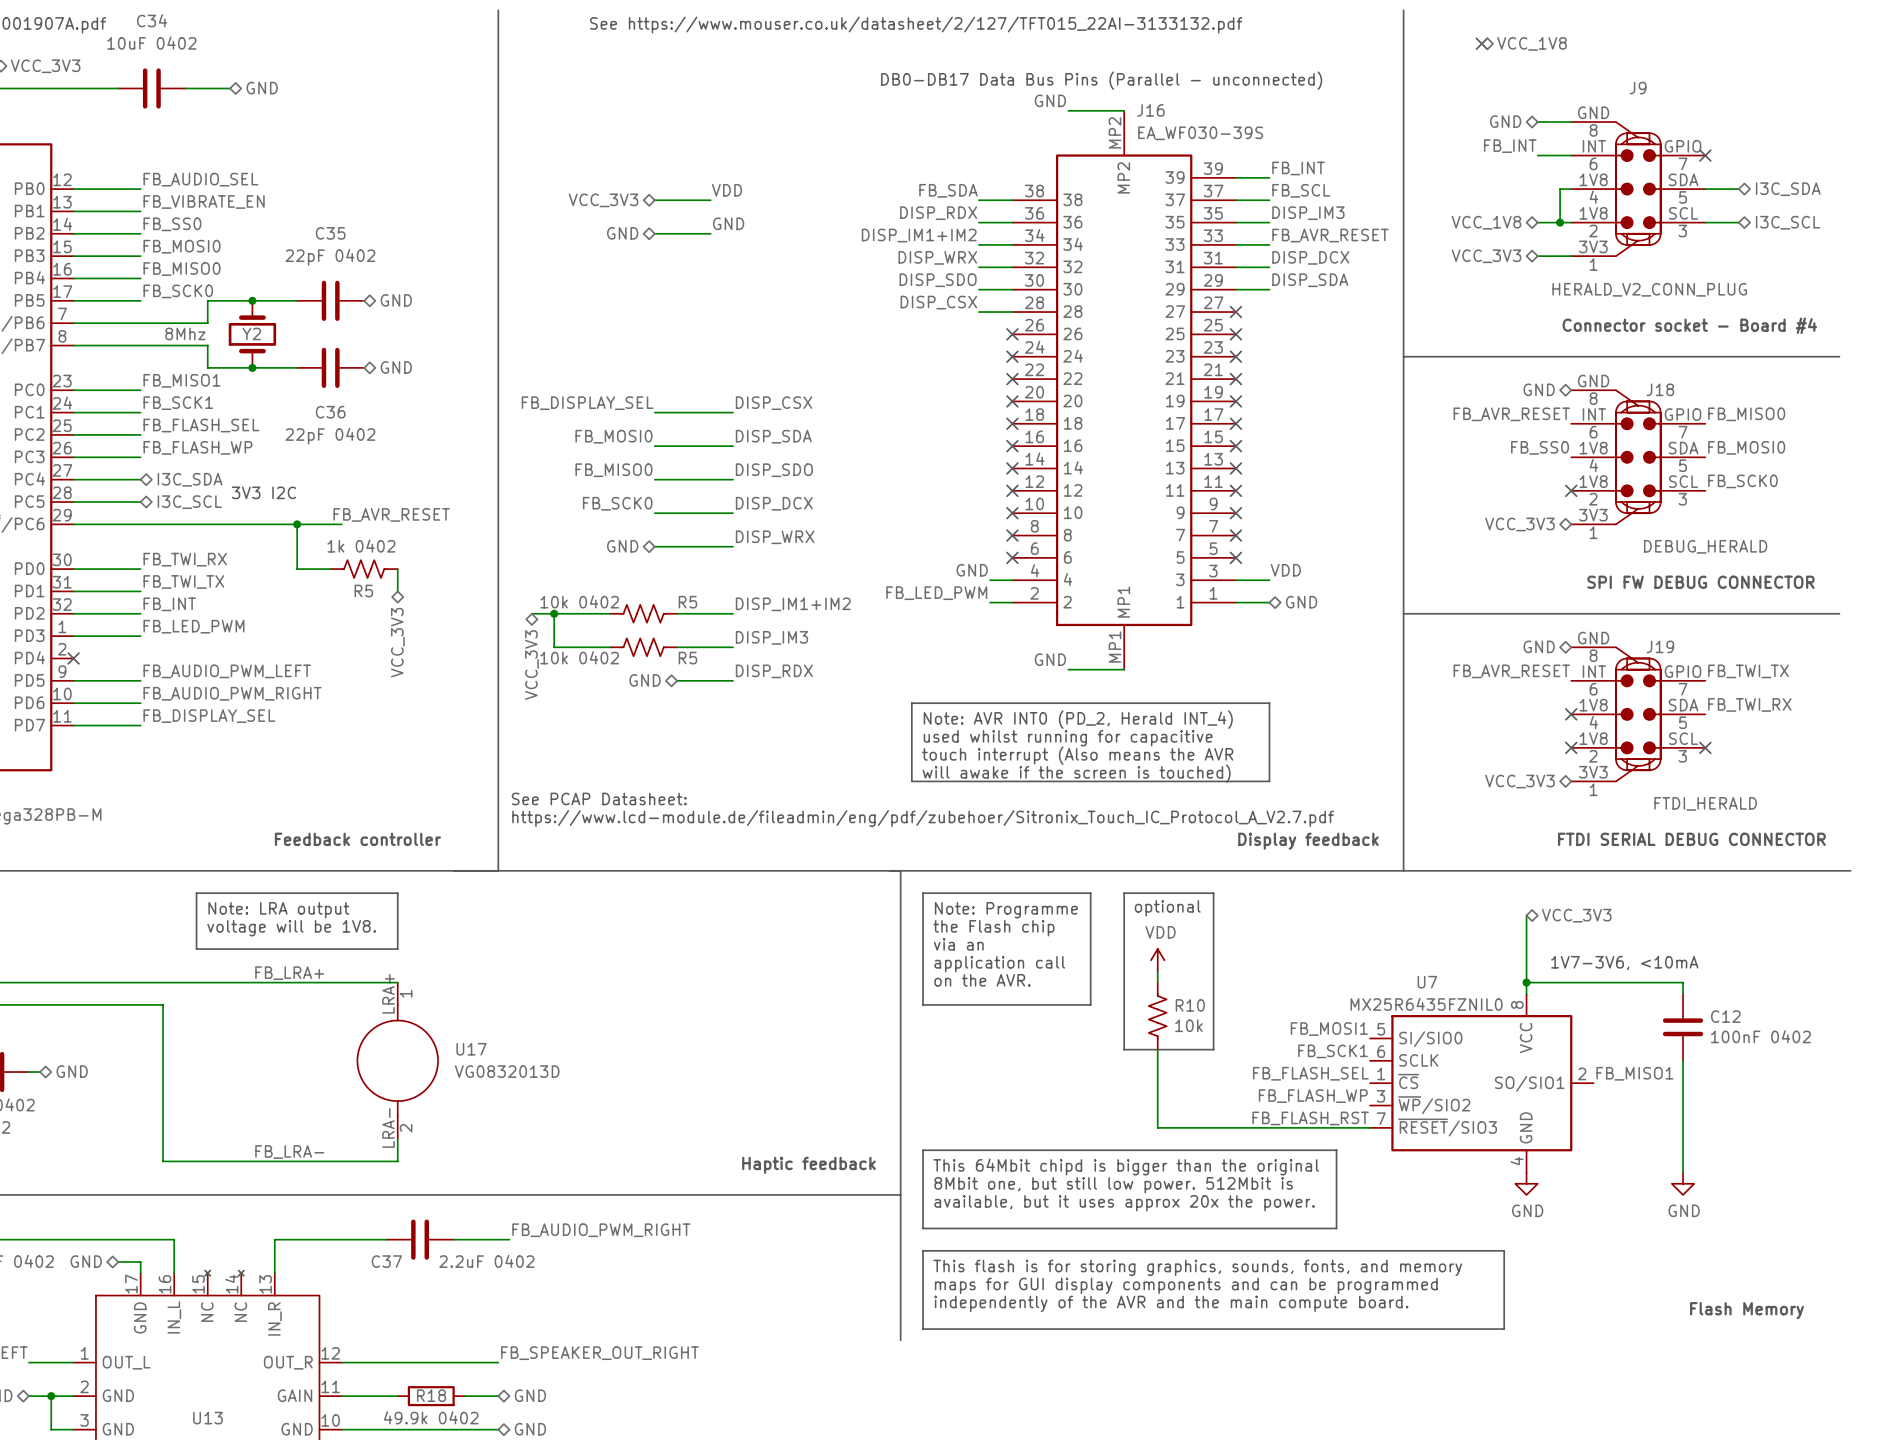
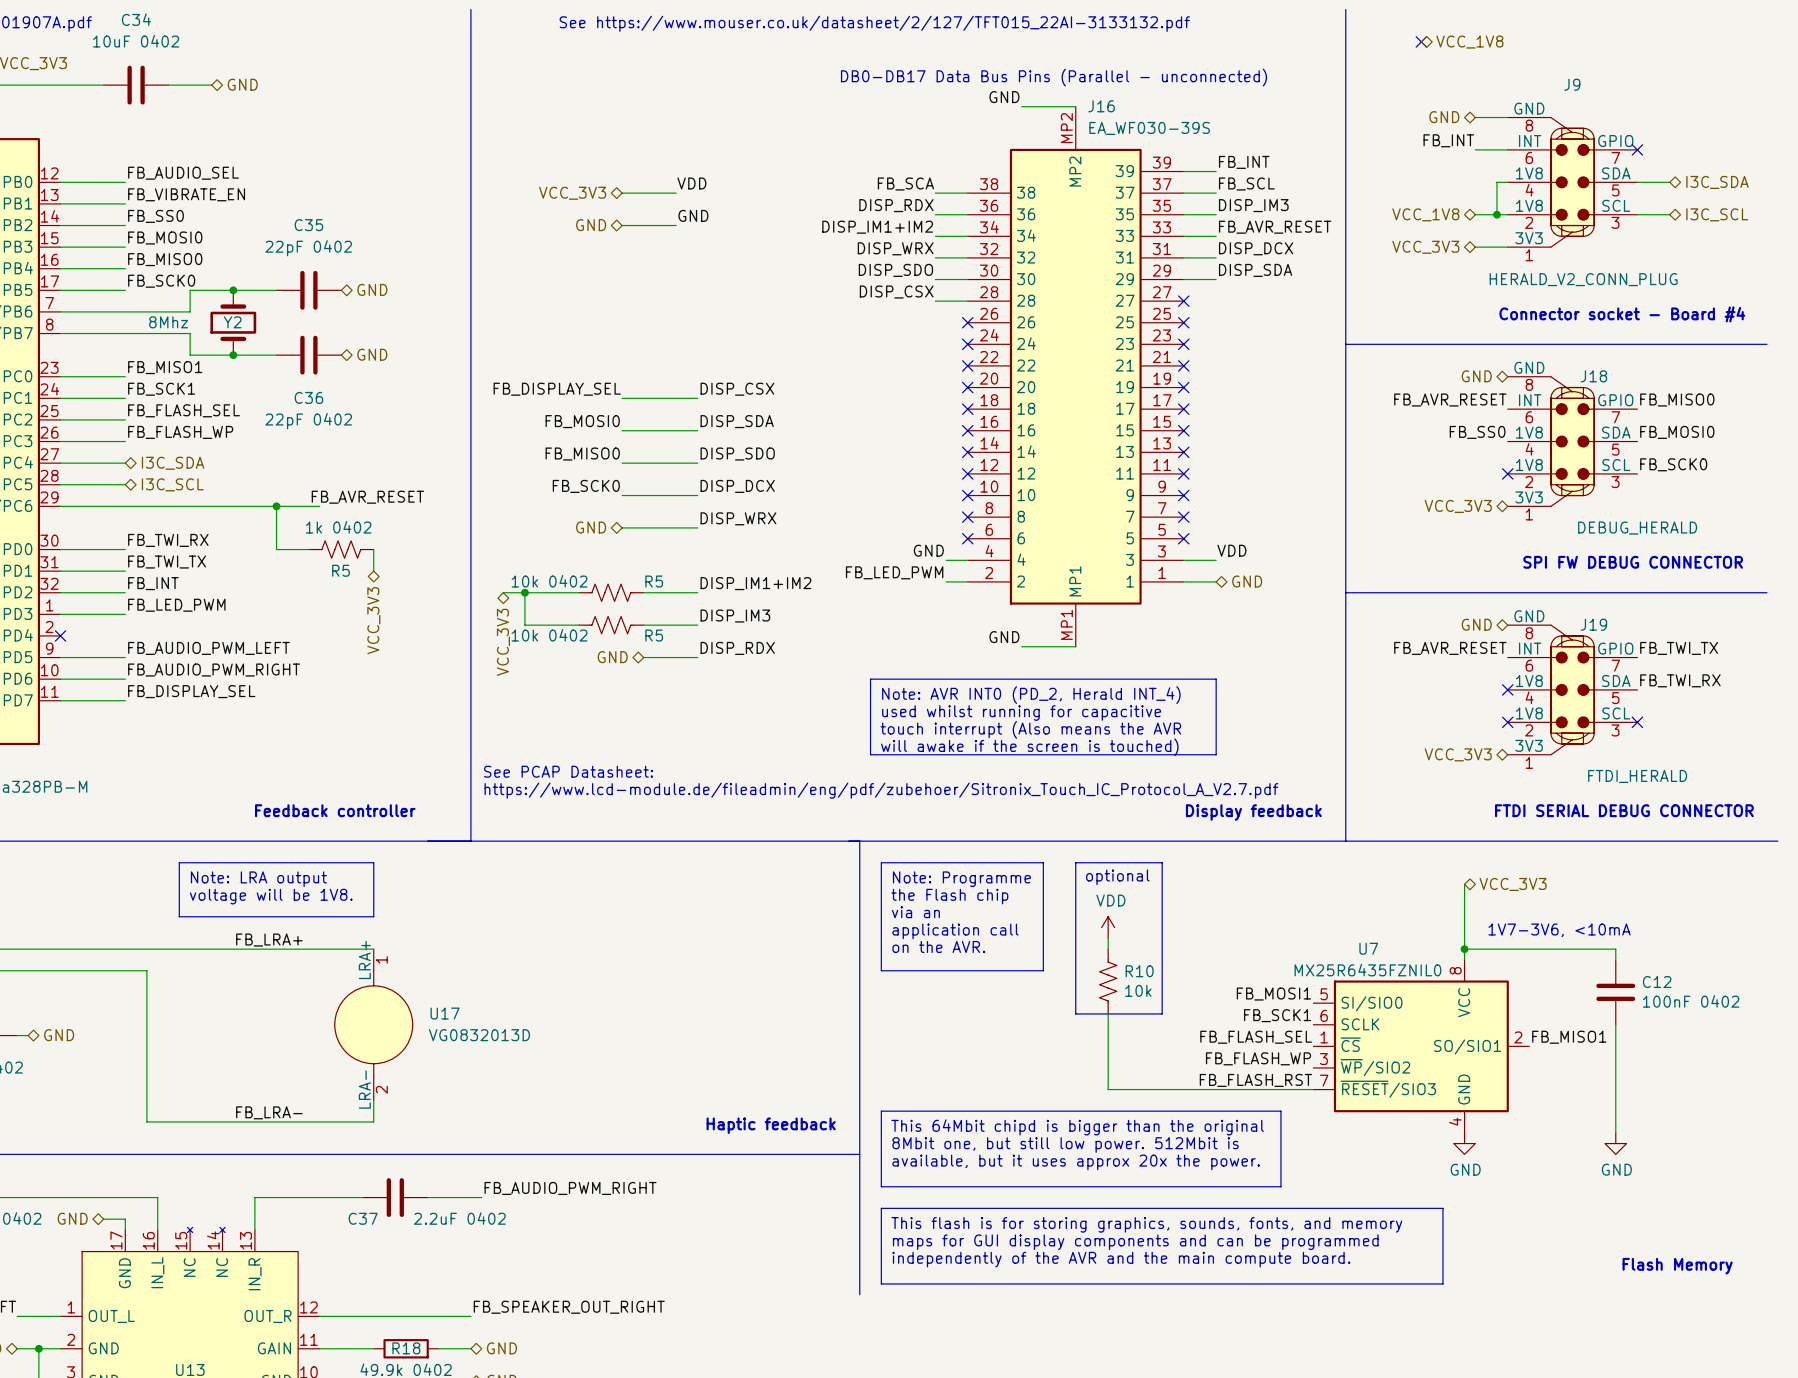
label: FB_SDA (948, 190) -> FB_SCA (905, 184)
text: 3V3 I2C (263, 492) -> none

